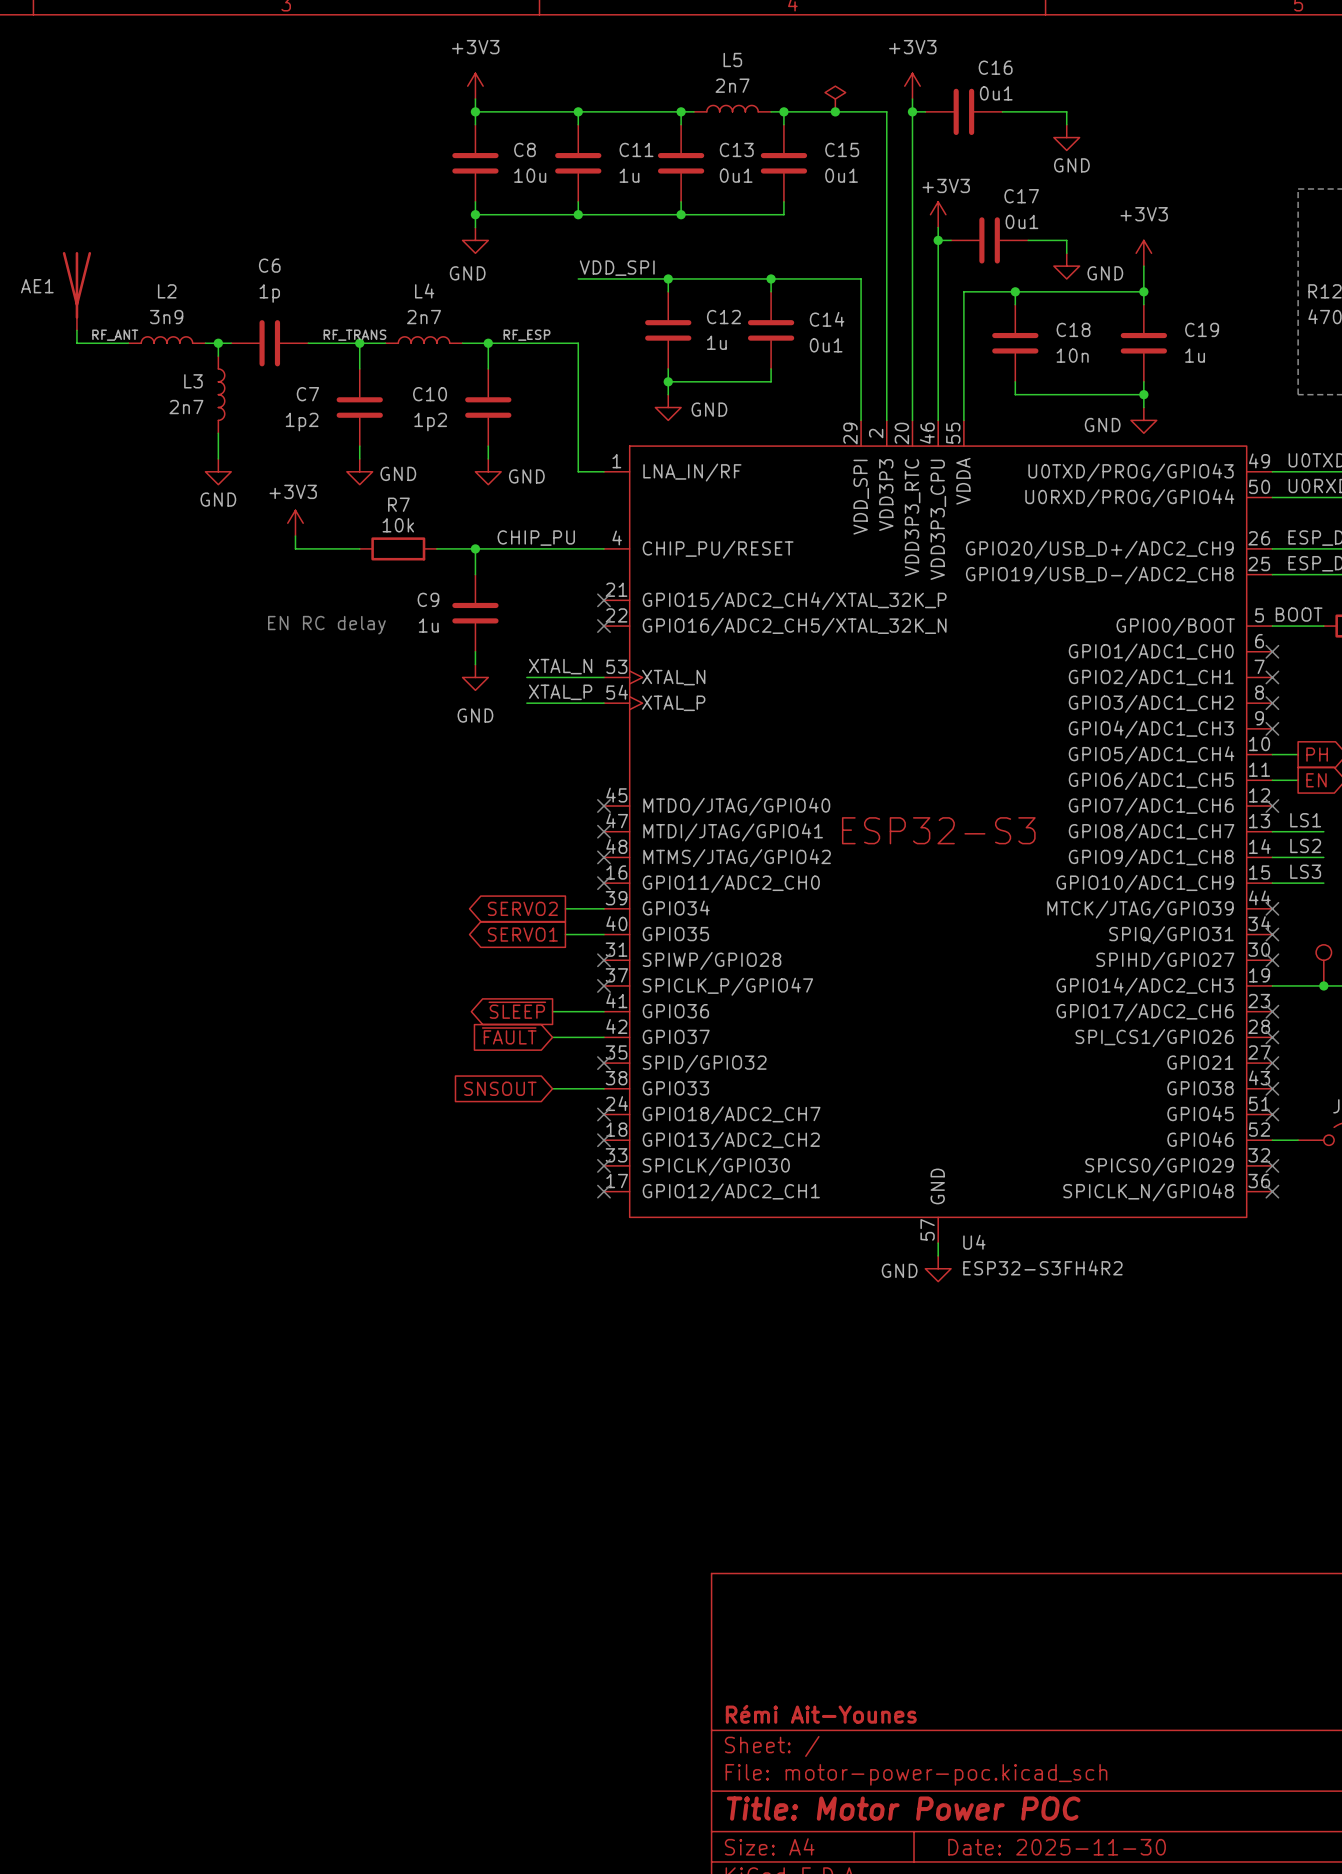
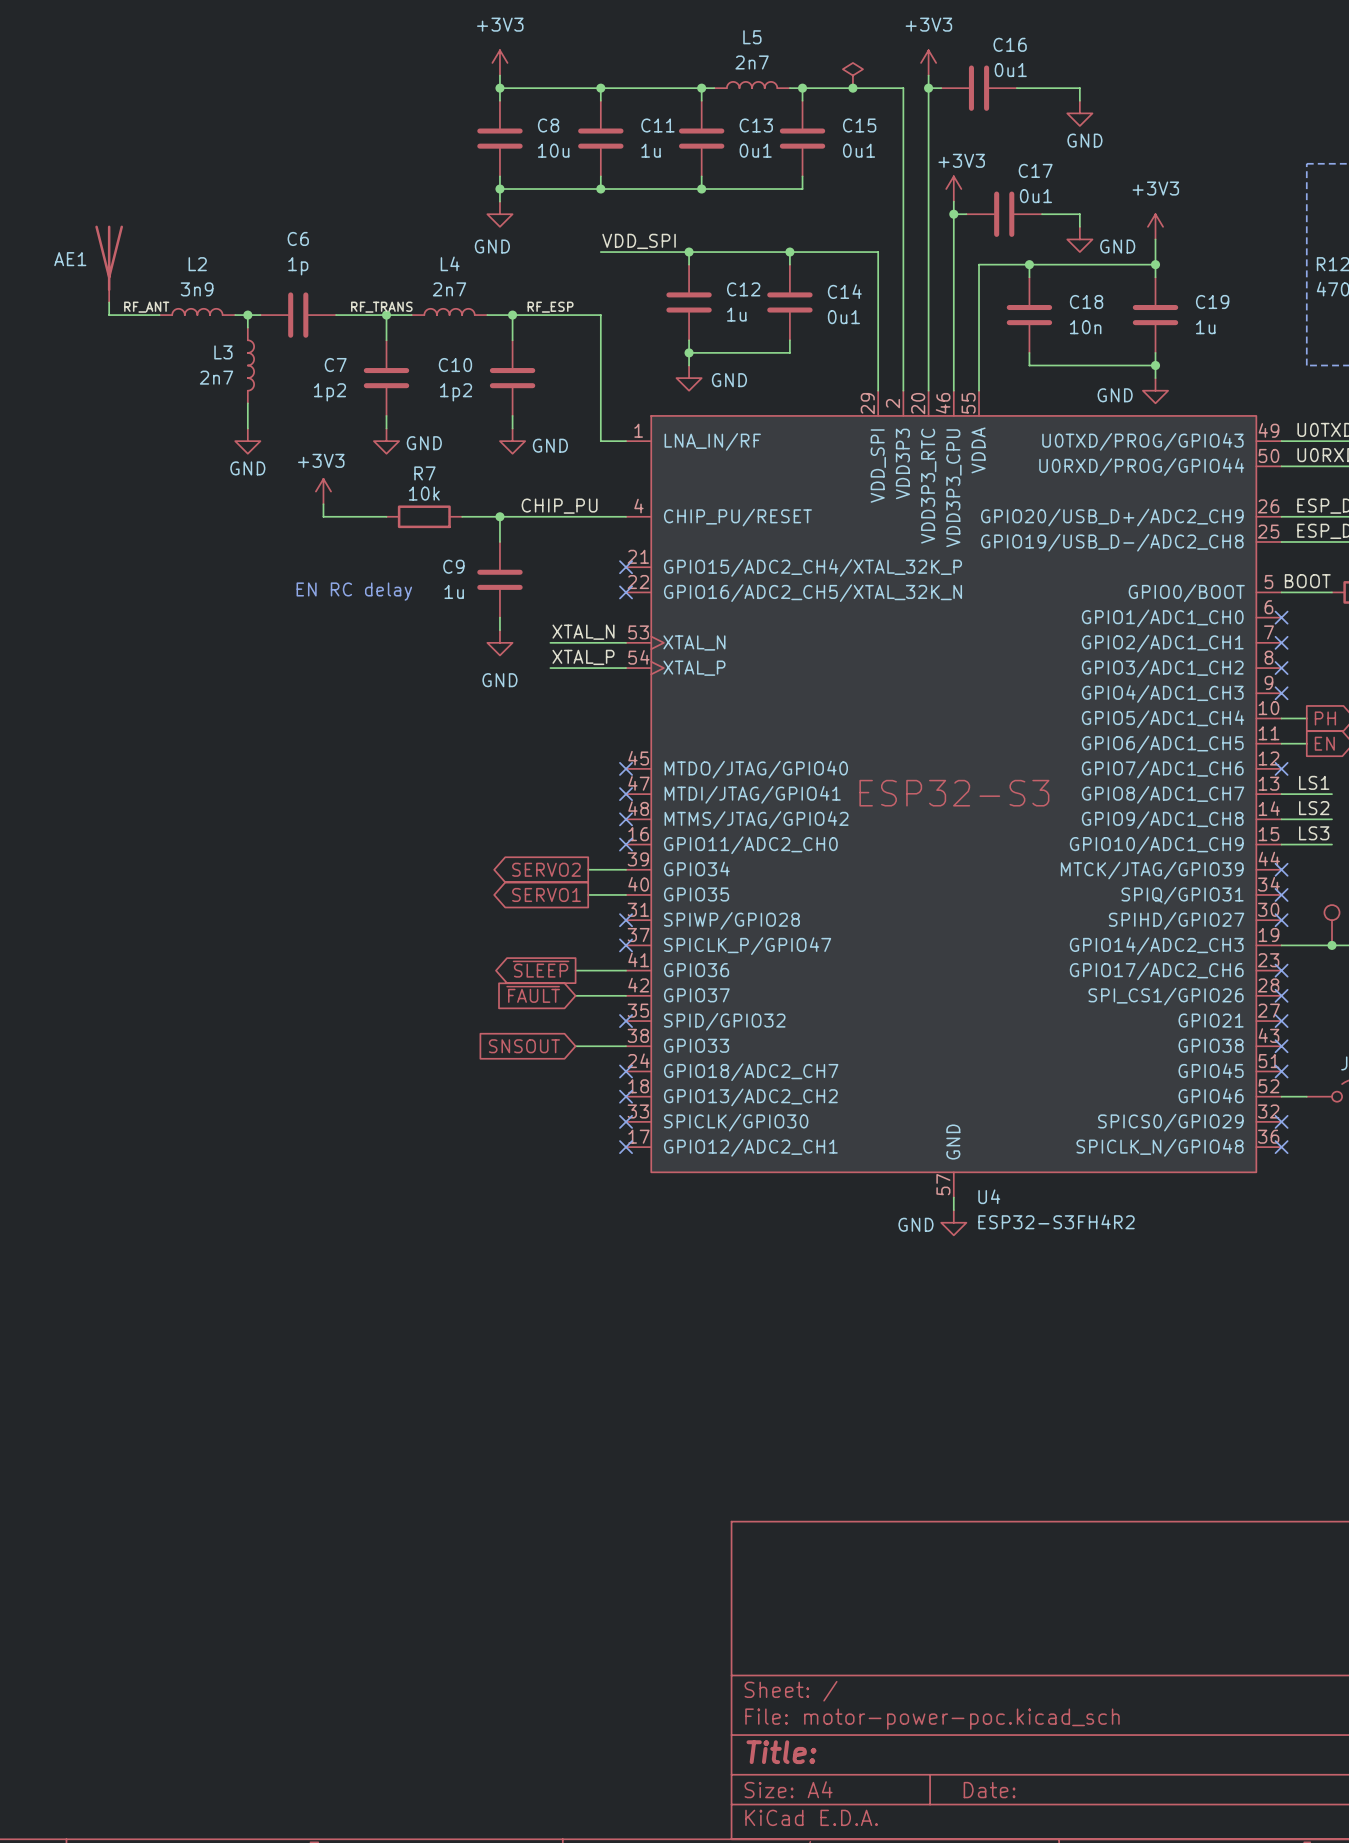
title block: Rémi Ait-Younes (821, 1714) -> none
title block: Title: Motor Power POC (903, 1808) -> Title: (781, 1752)
title block: Date: 2025-11-30 (1057, 1847) -> Date: (989, 1790)

